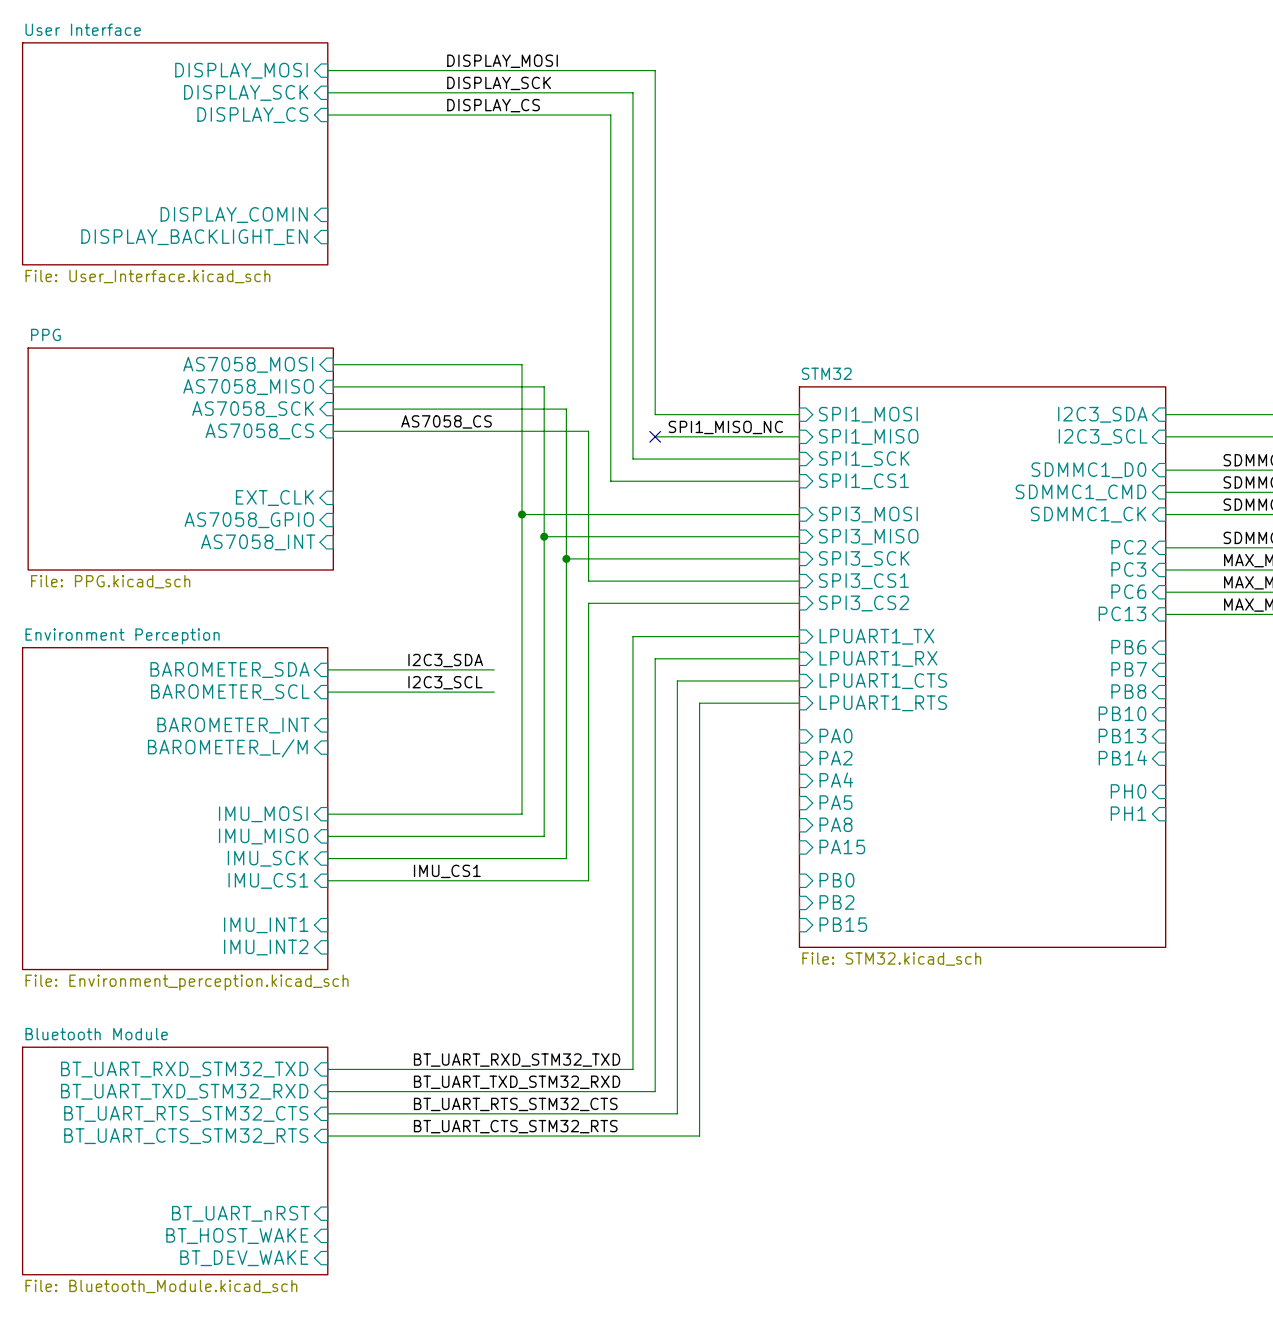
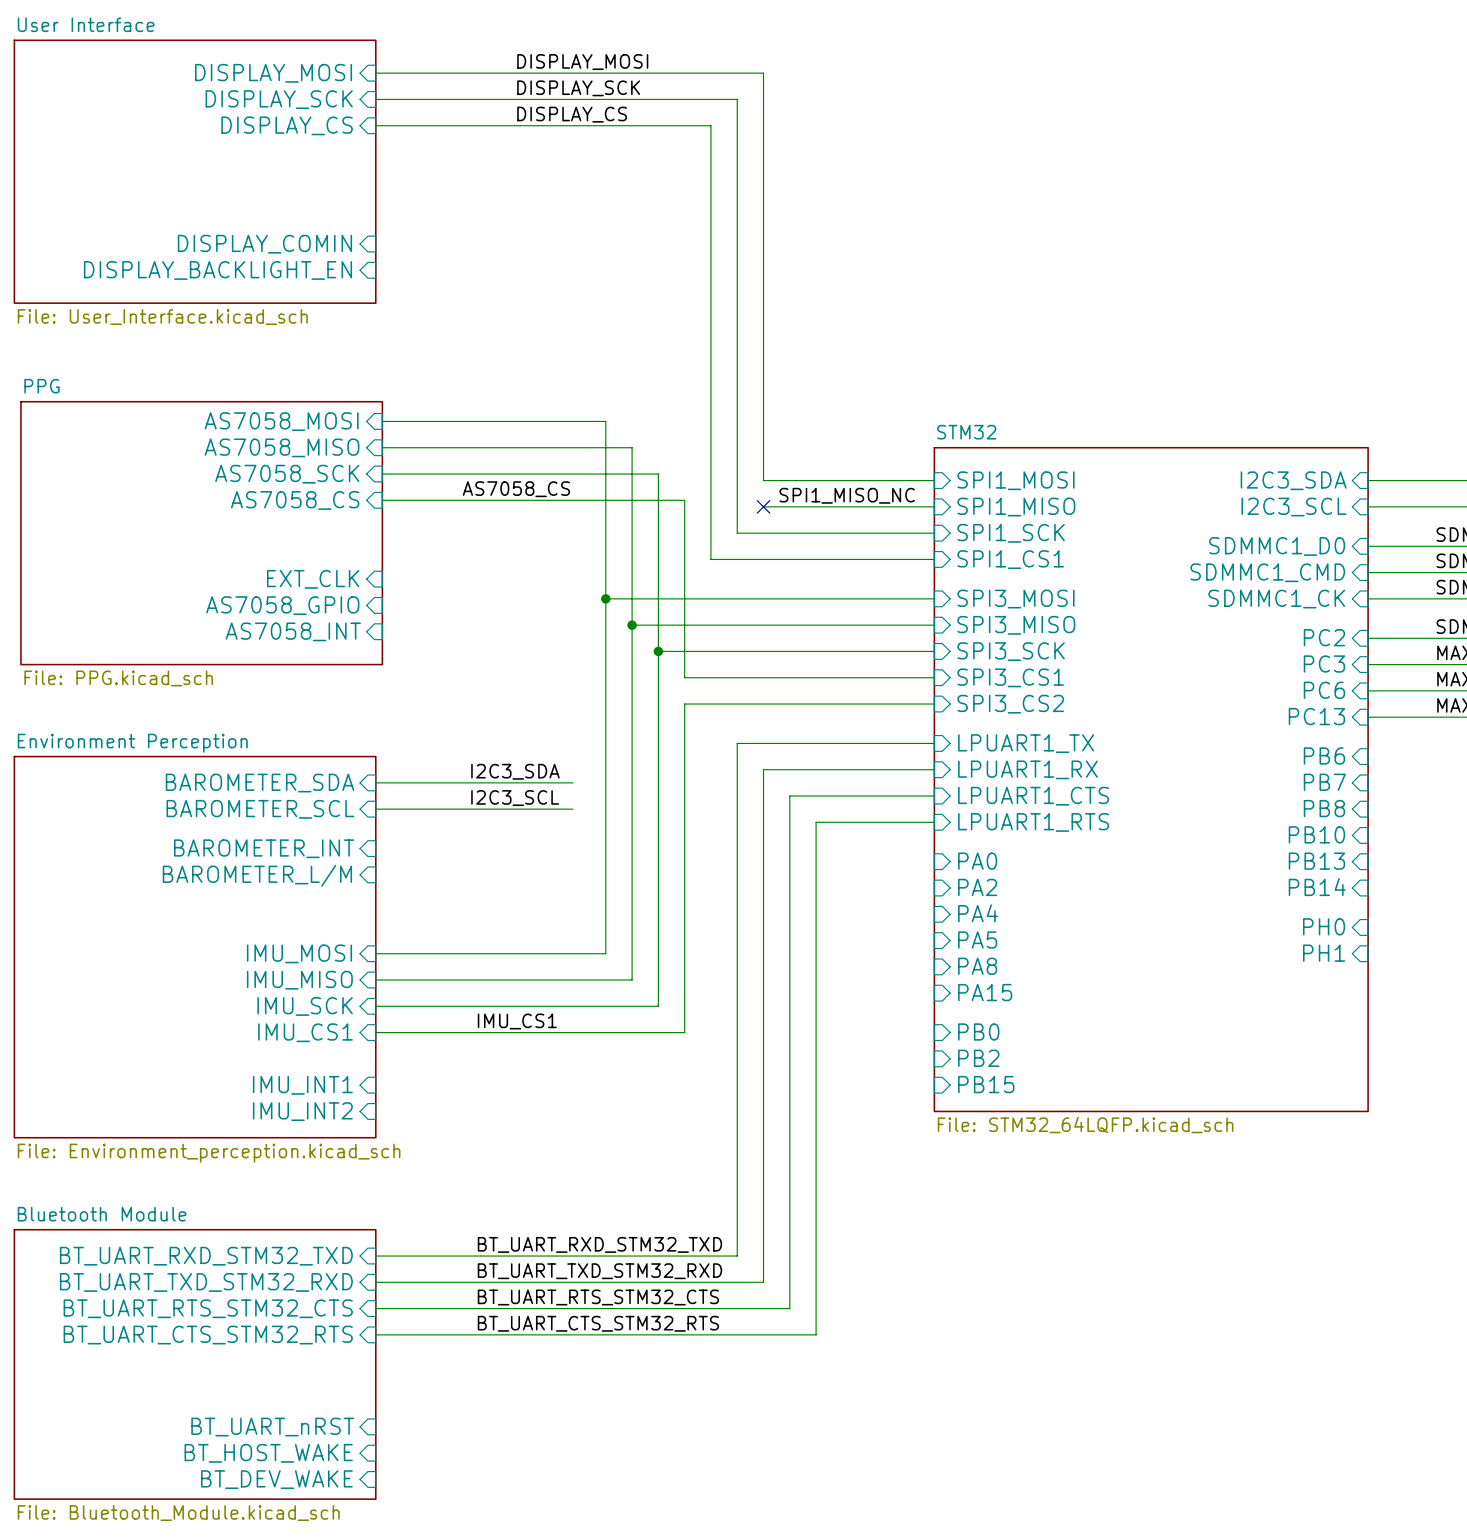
sheet STM32 value: File: STM32.kicad_sch (891, 959) -> File: STM32_64LQFP.kicad_sch (1085, 1125)

